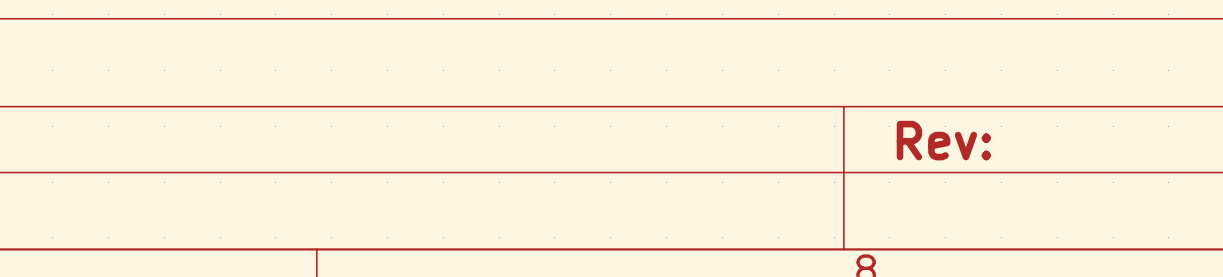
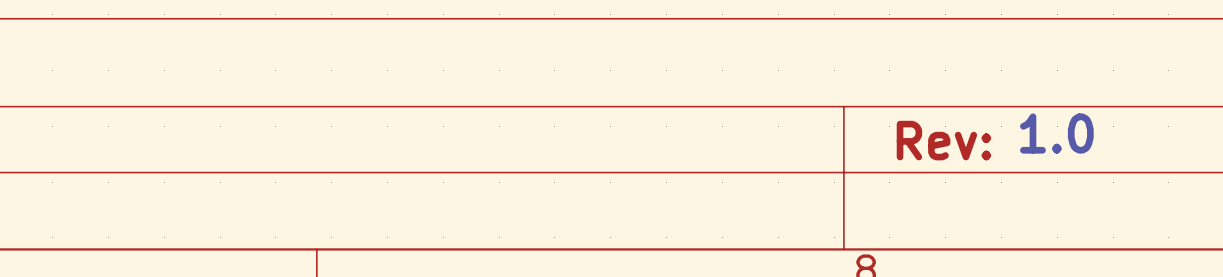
text: none -> 1.0 (1056, 133)

